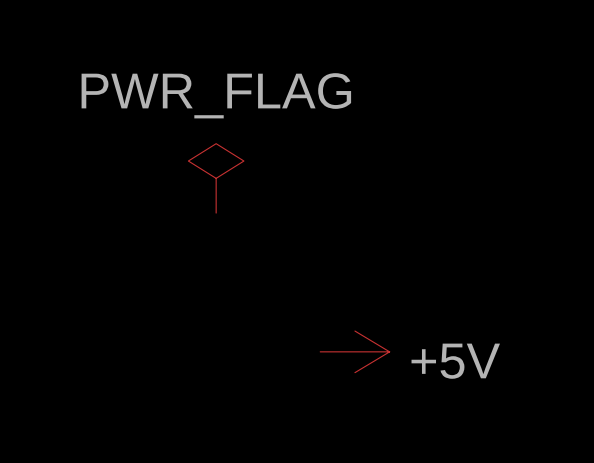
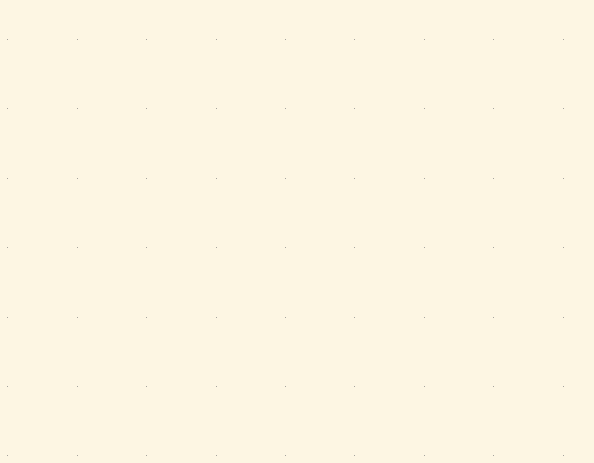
power symbol: PWR_FLAG (216, 178) -> none
power symbol: +5V (354, 351) -> none

